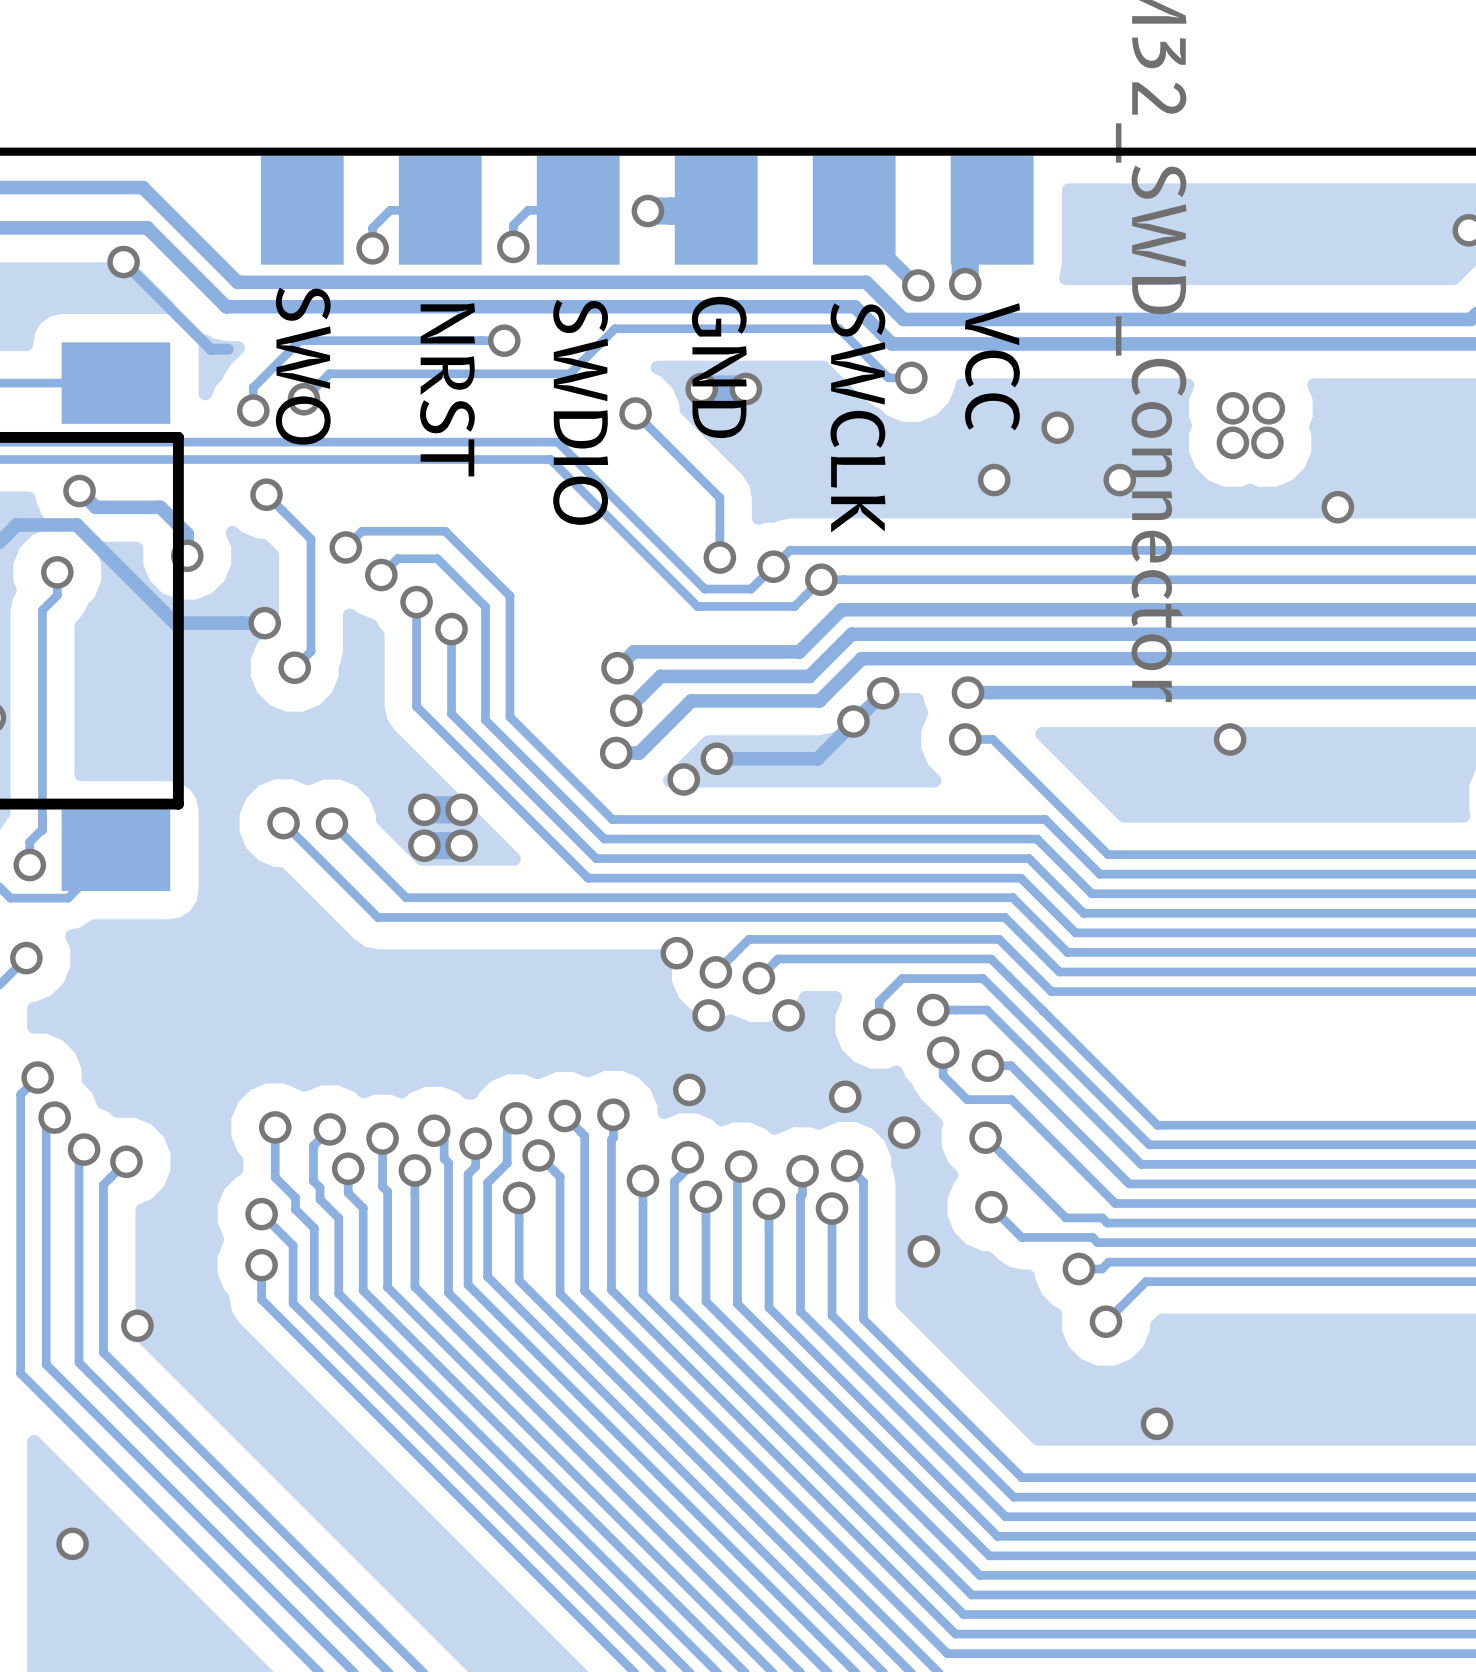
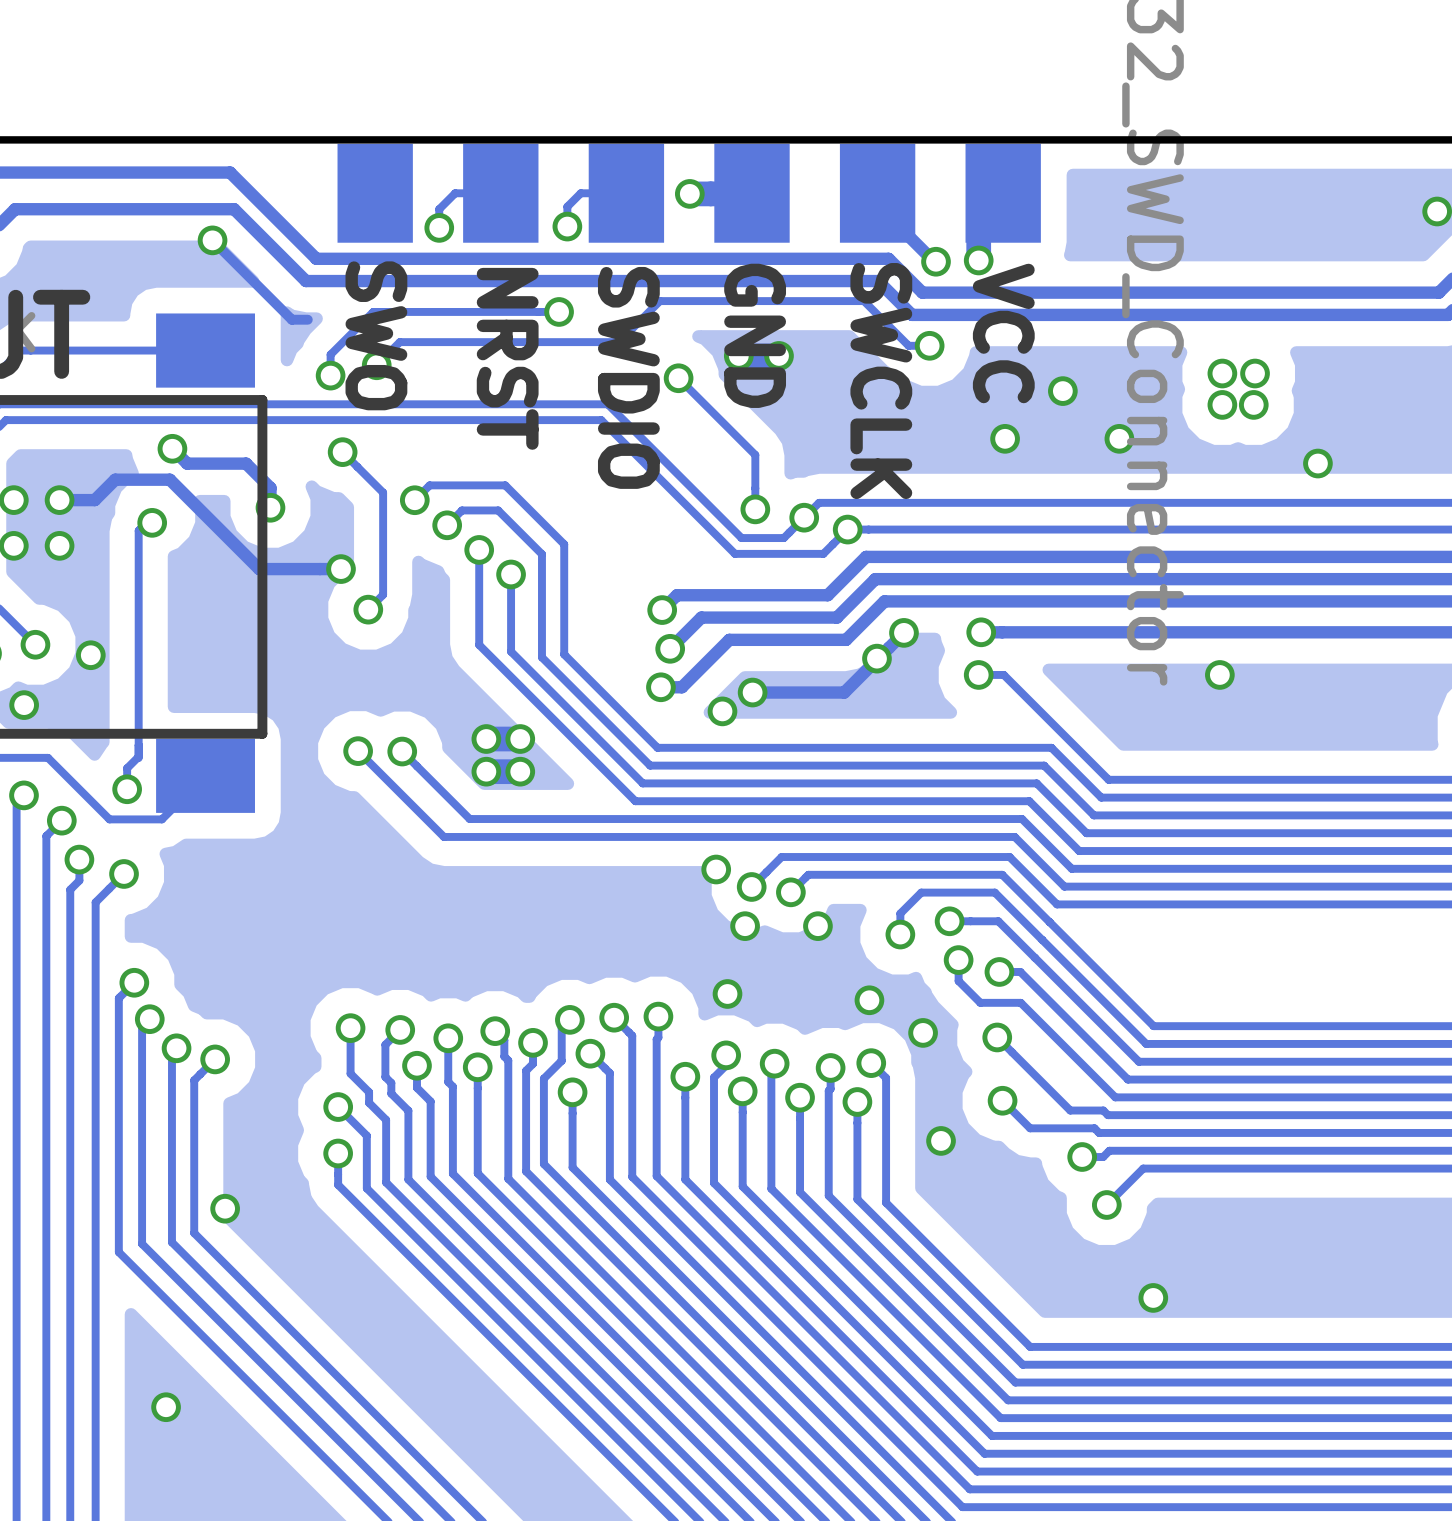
track: (57, 572) (57, 595) (42, 610) -> (155, 514) (138, 530) (138, 557)

